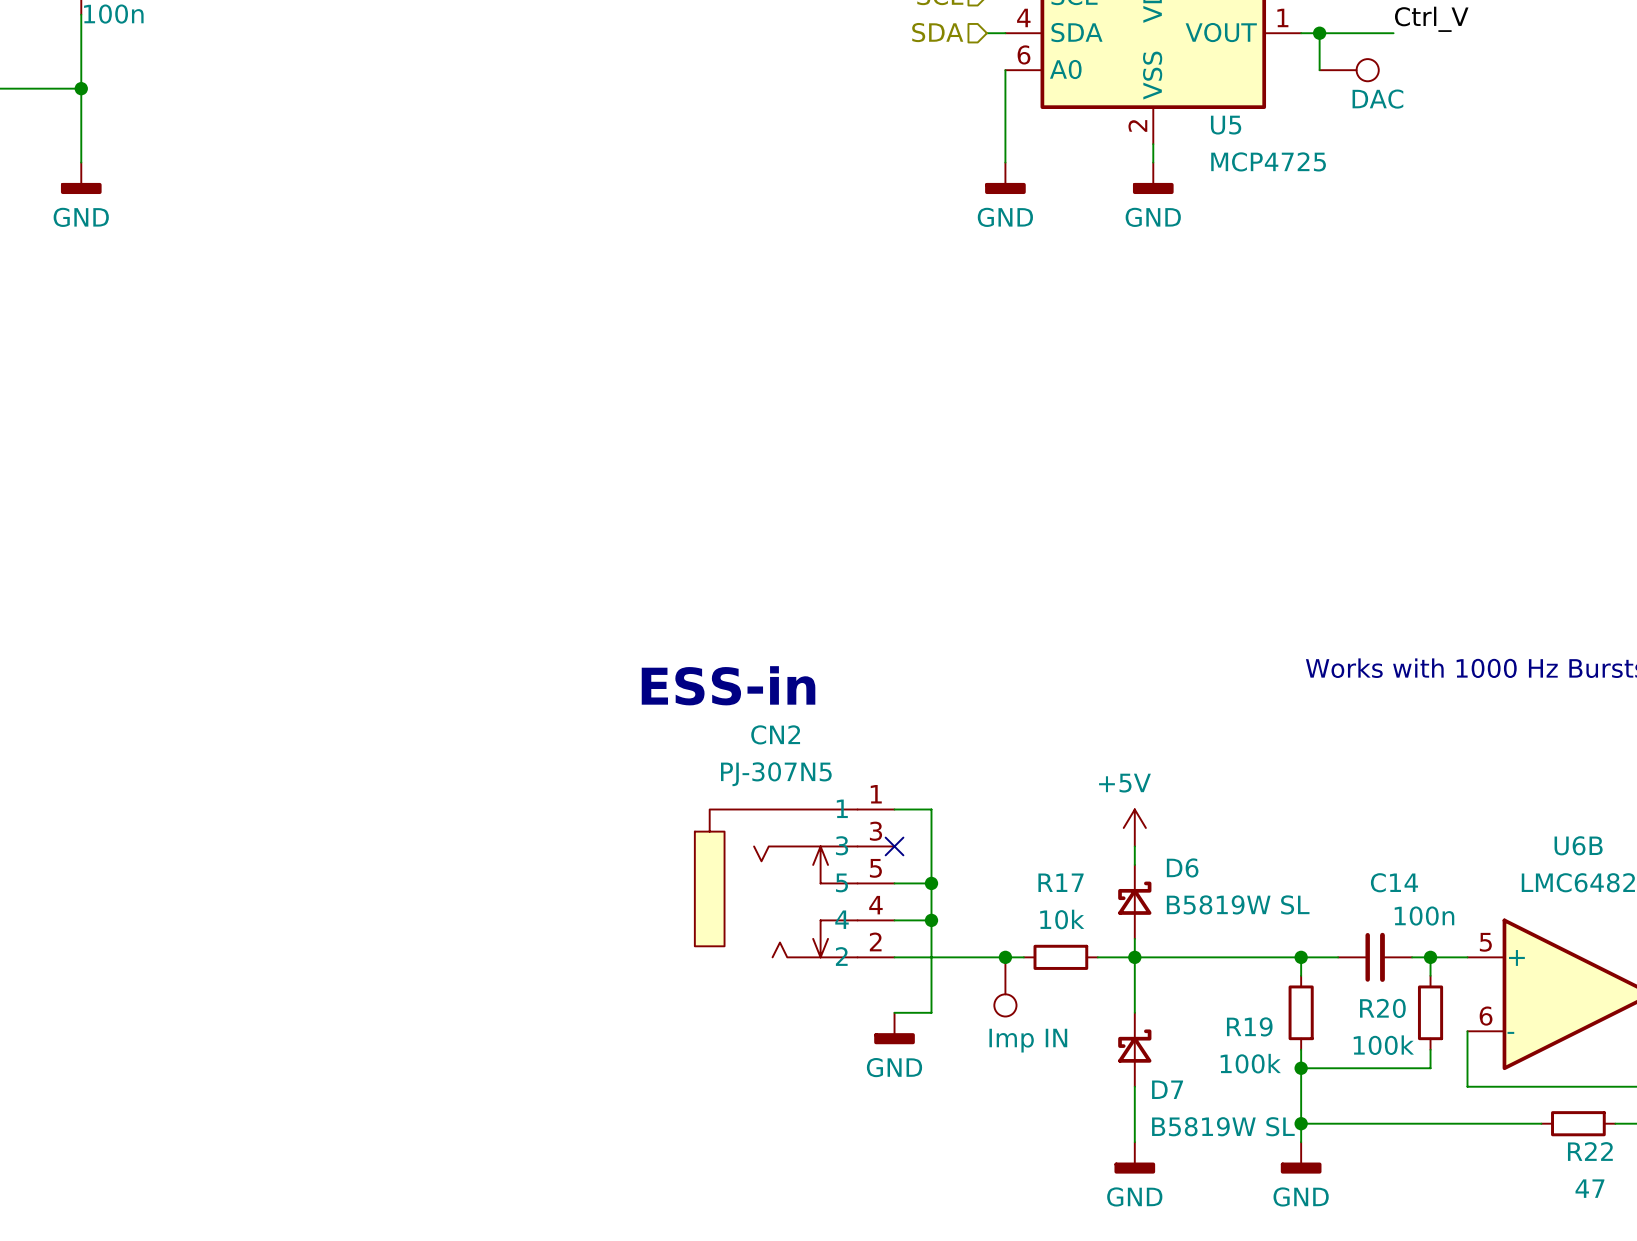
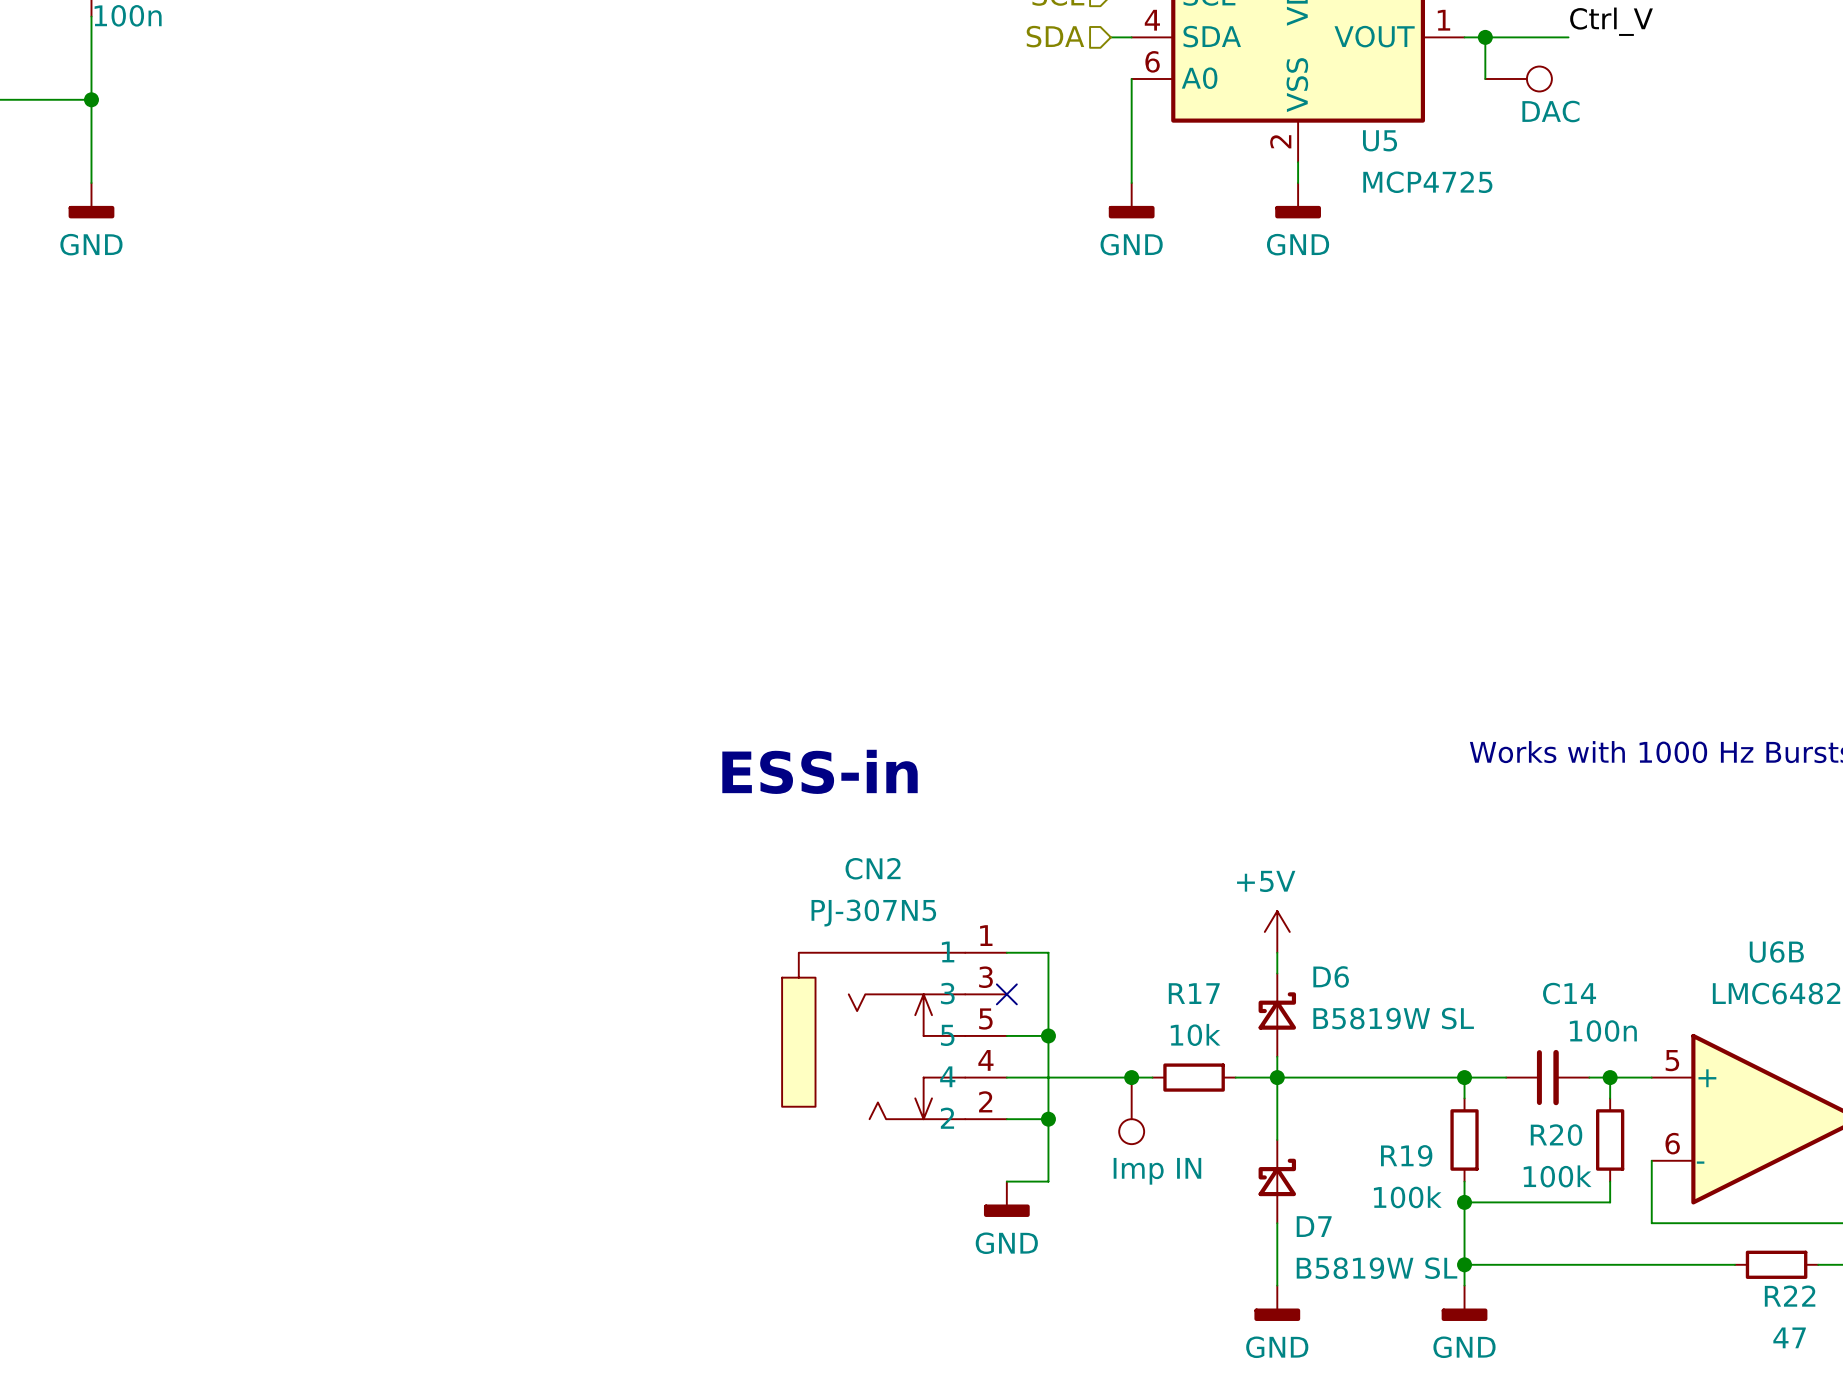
wire: (894, 809) (931, 809) (931, 846) -> (1006, 952) (1048, 952)
no-connect mark position: (894, 846) -> (1006, 994)
CN2 position: (794, 883) -> (894, 1035)
wire: (894, 883) (931, 883) -> (1006, 1119) (1048, 1119)
junction: (931, 883) -> none
junction: none -> (1048, 1119)
wire: (894, 1012) (931, 1012) -> (1006, 1181) (1048, 1181) (1048, 1139)
power symbol position: GND (894, 1028) -> GND (1006, 1199)

